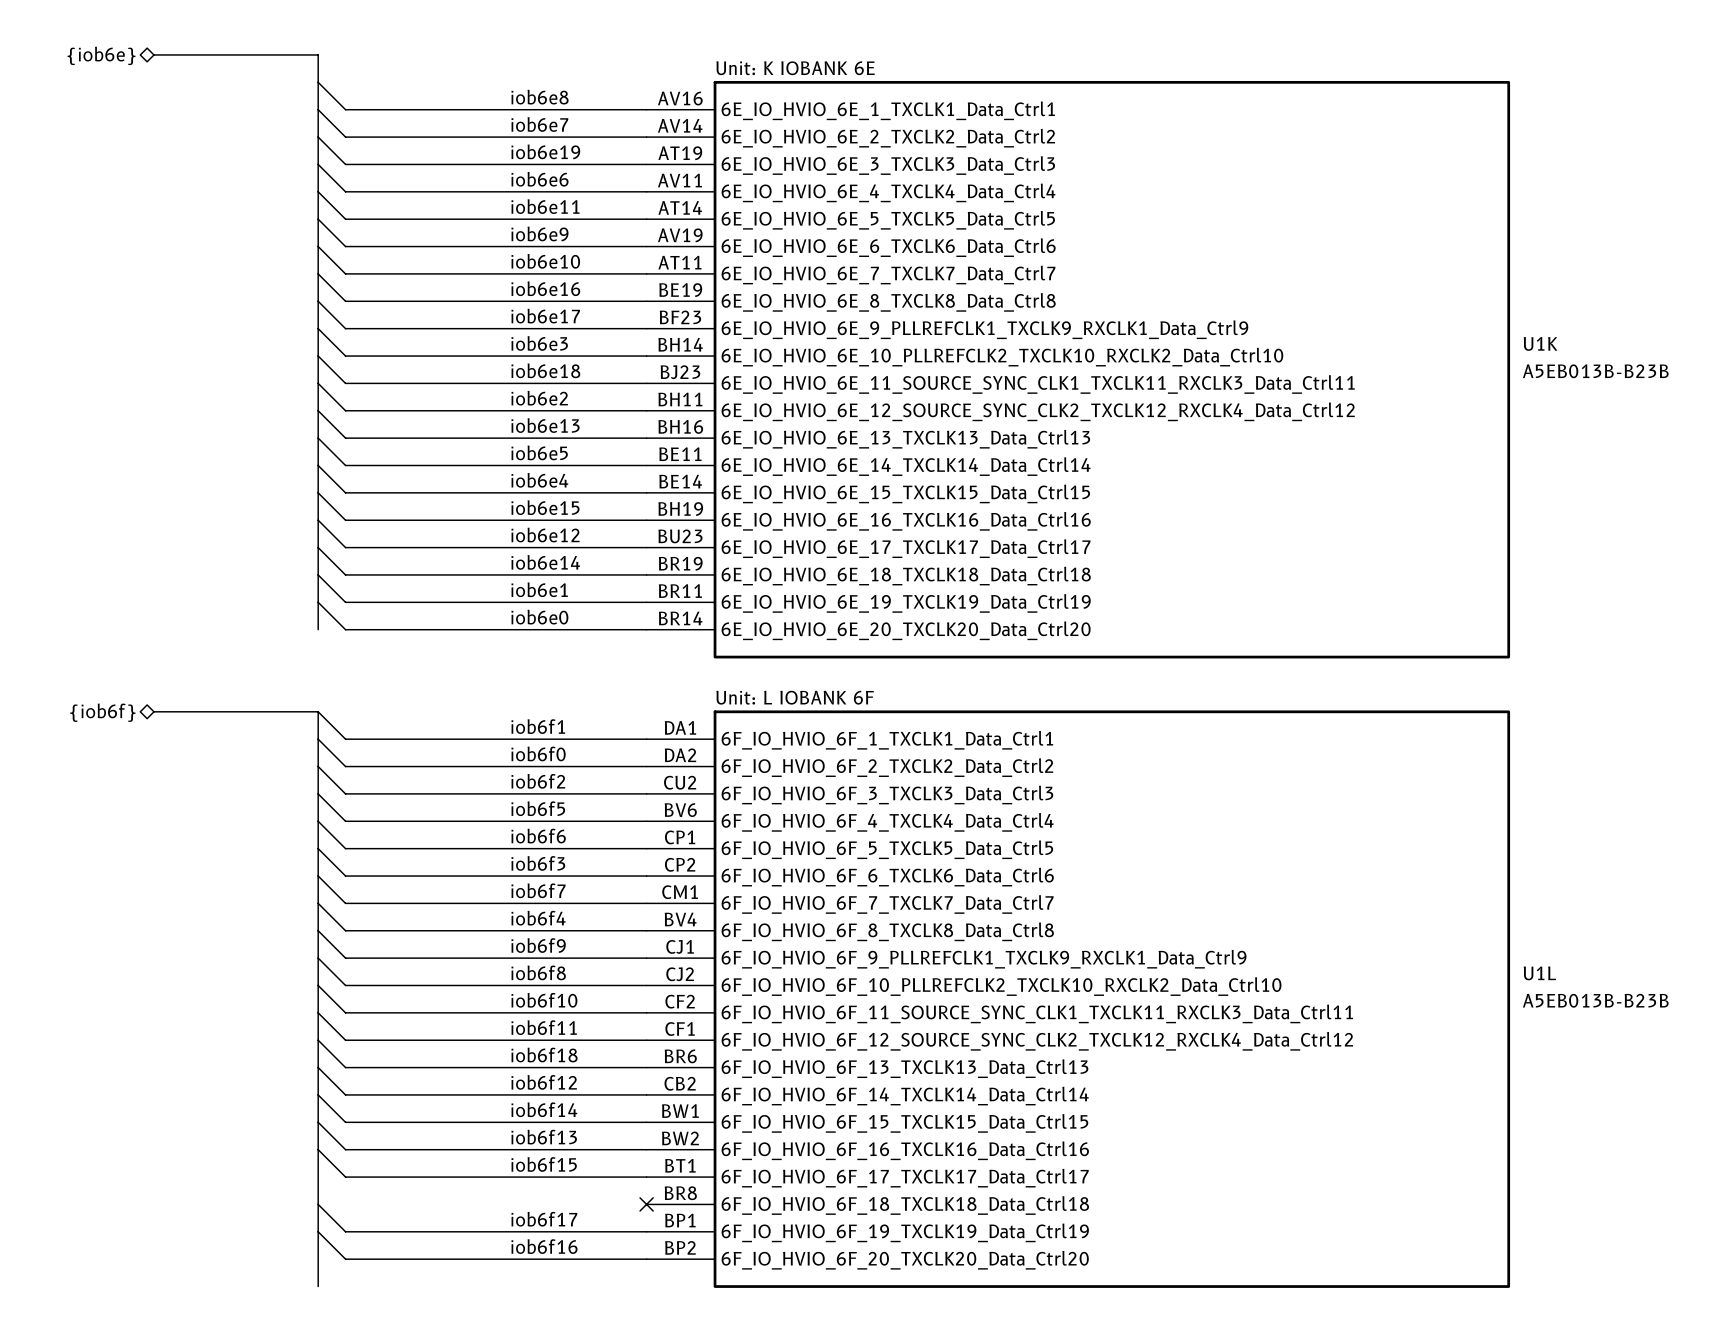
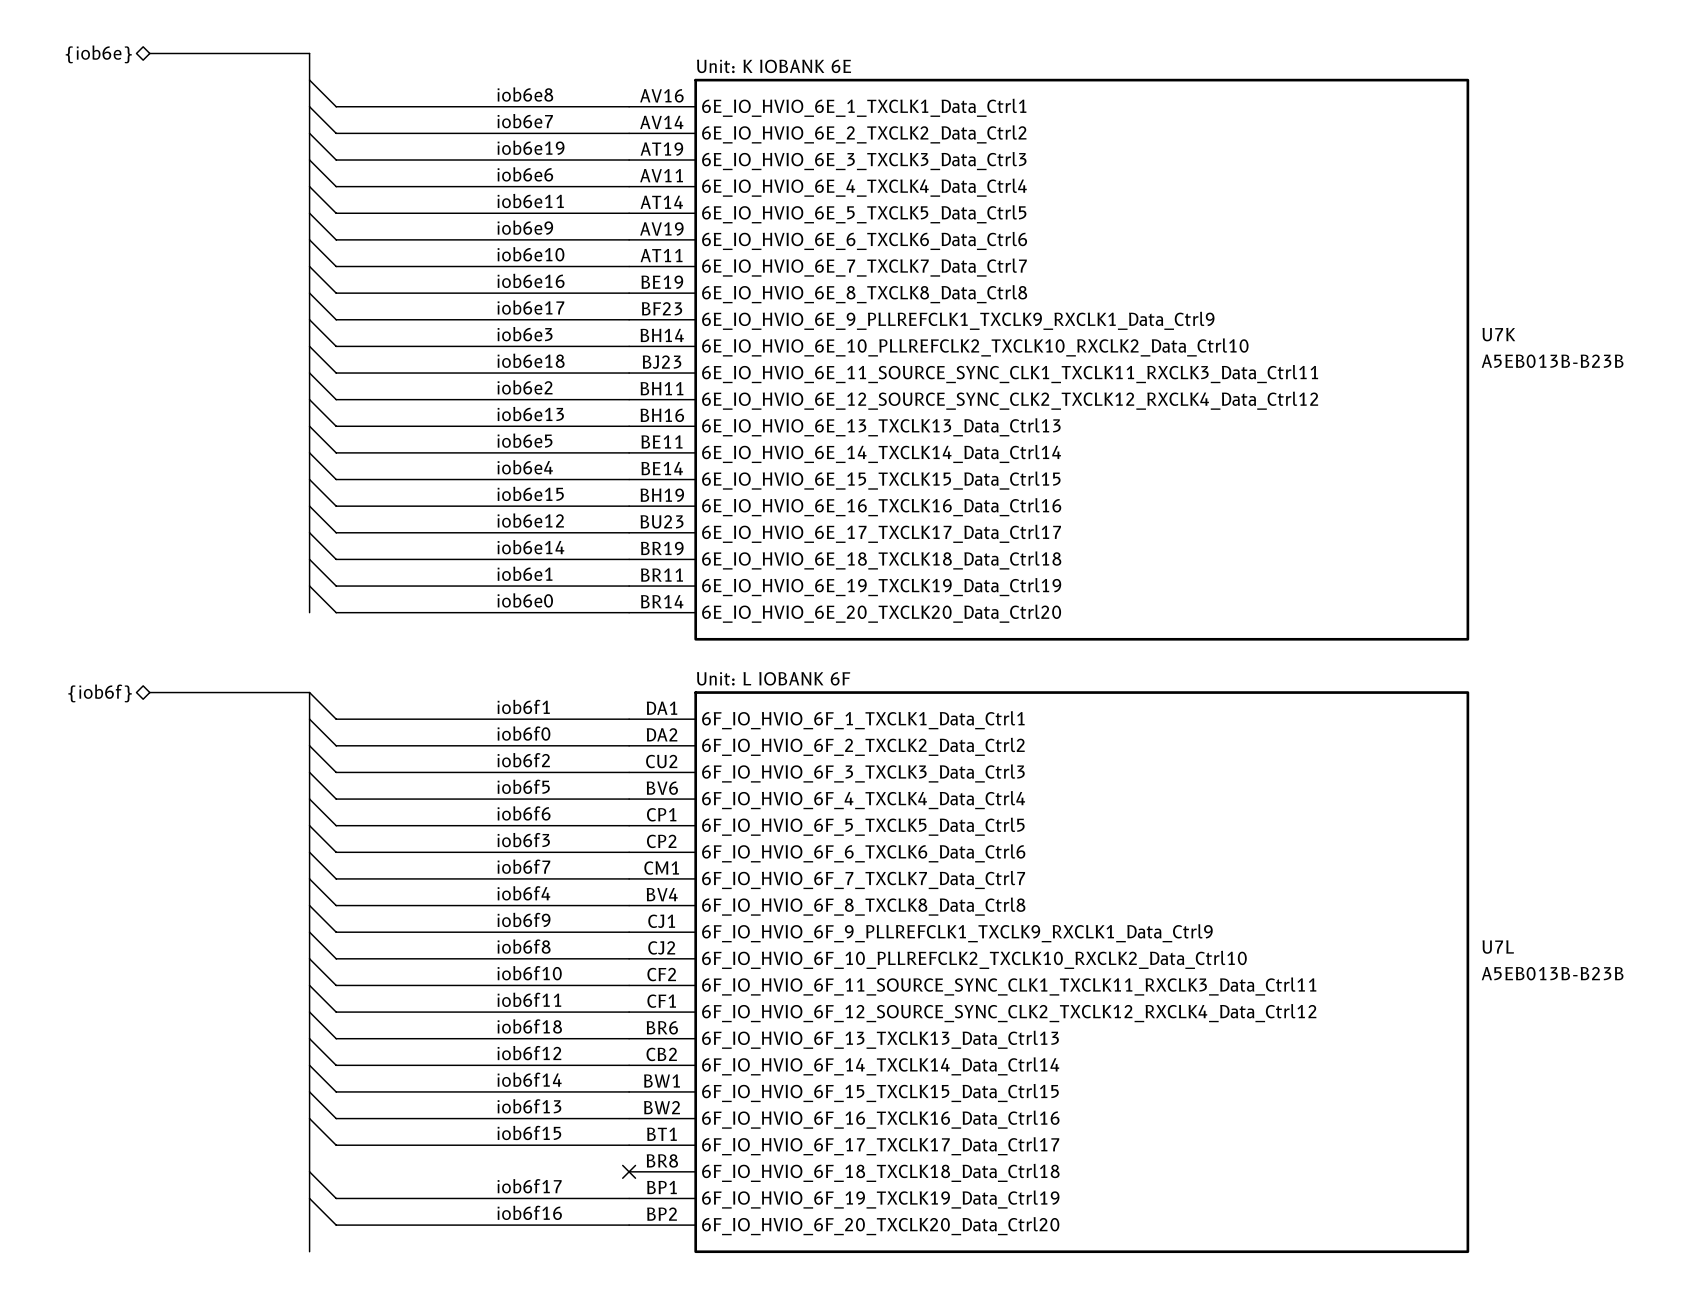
U1K name: U1K (1540, 343) -> U7K (1498, 334)
U1L name: U1L (1539, 973) -> U7L (1498, 947)

